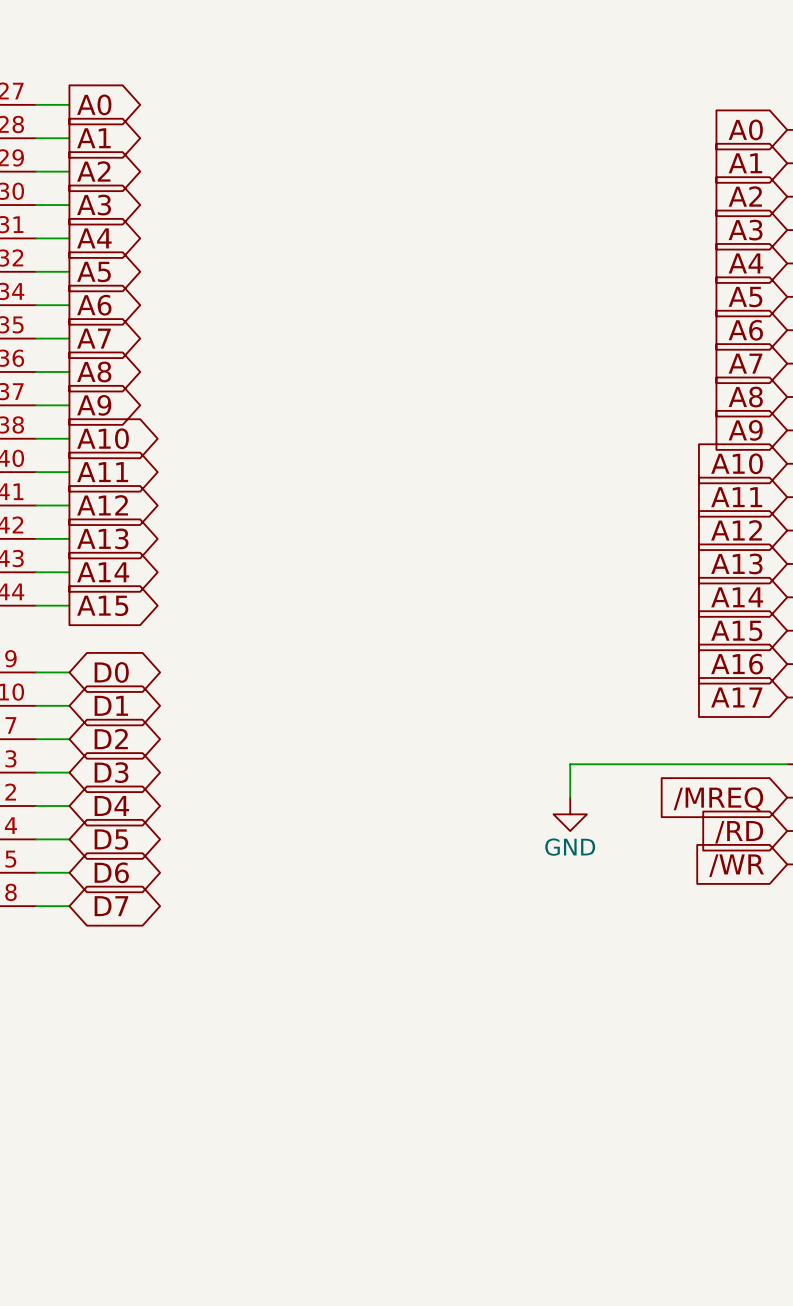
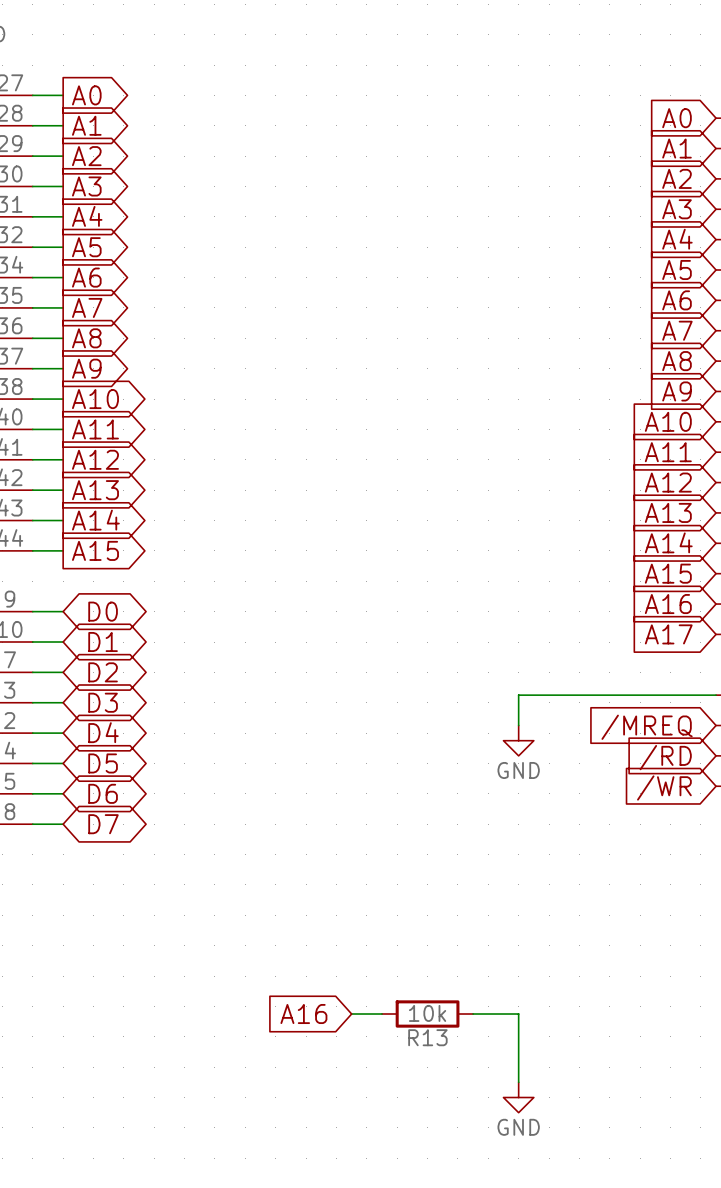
global label: none -> A16 (303, 1014)
wire: none -> (351, 1014) (382, 1014)
R13: none -> 10k (427, 1014)
wire: none -> (473, 1014) (518, 1014) (518, 1082)
power symbol: none -> GND (518, 1097)

